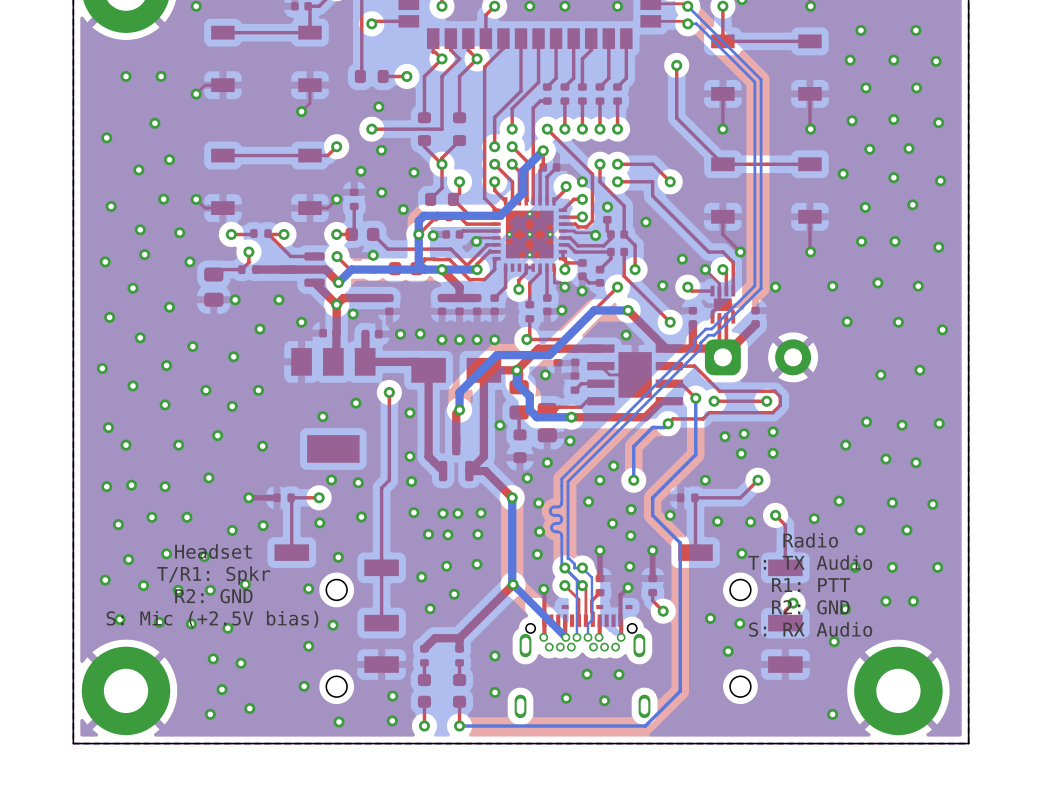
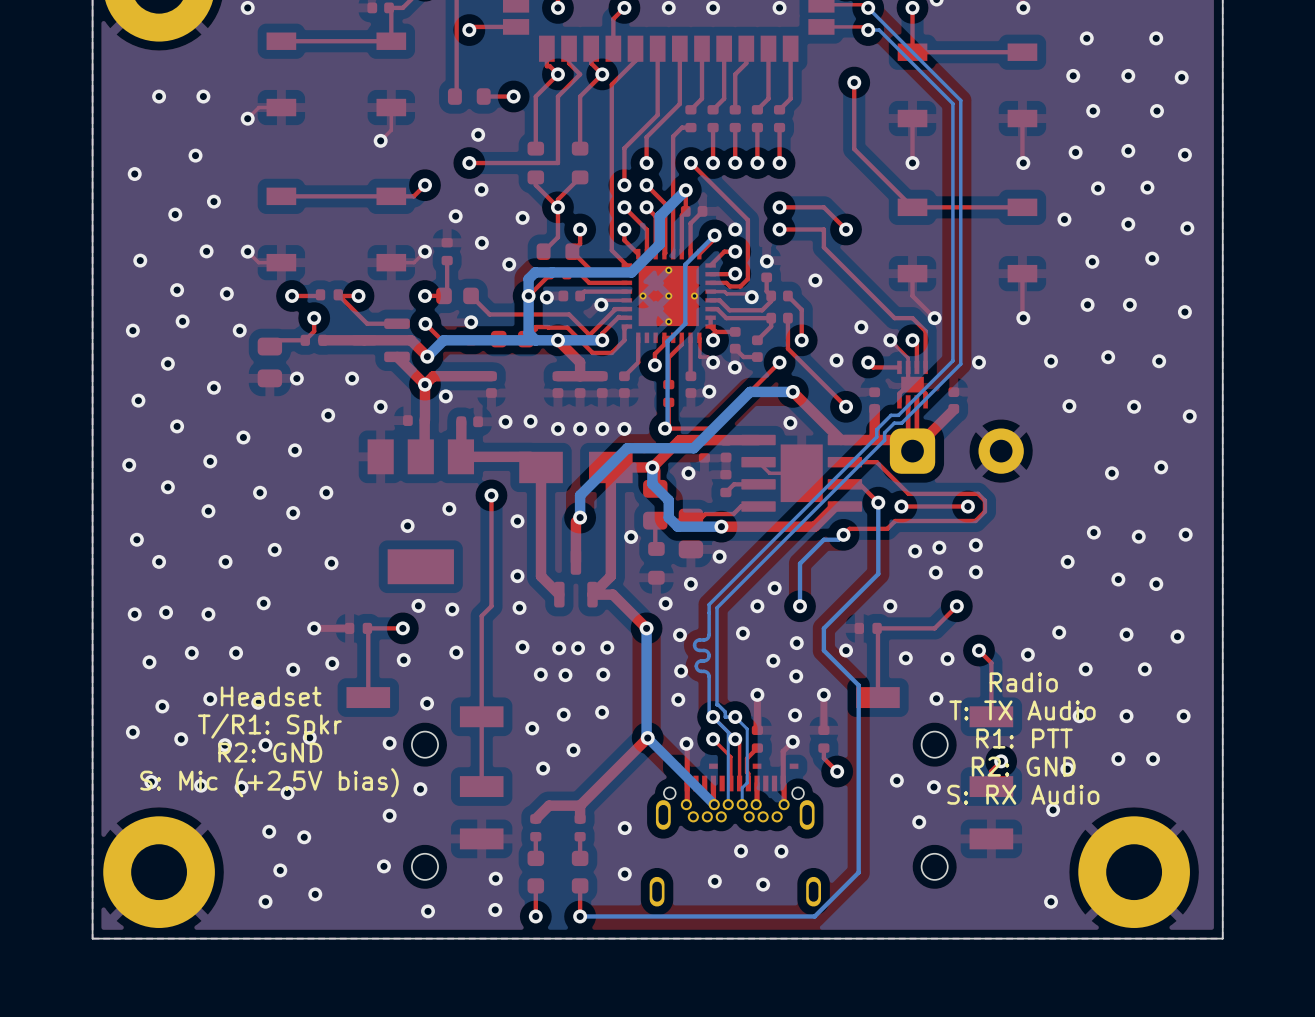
top track: (599, 164) (599, 181) (624, 206) (624, 234) -> none
via: (599, 164) -> none
bottom track: none -> (714, 235) (685, 264) (685, 323) (667, 341) (667, 426) (665, 428)

